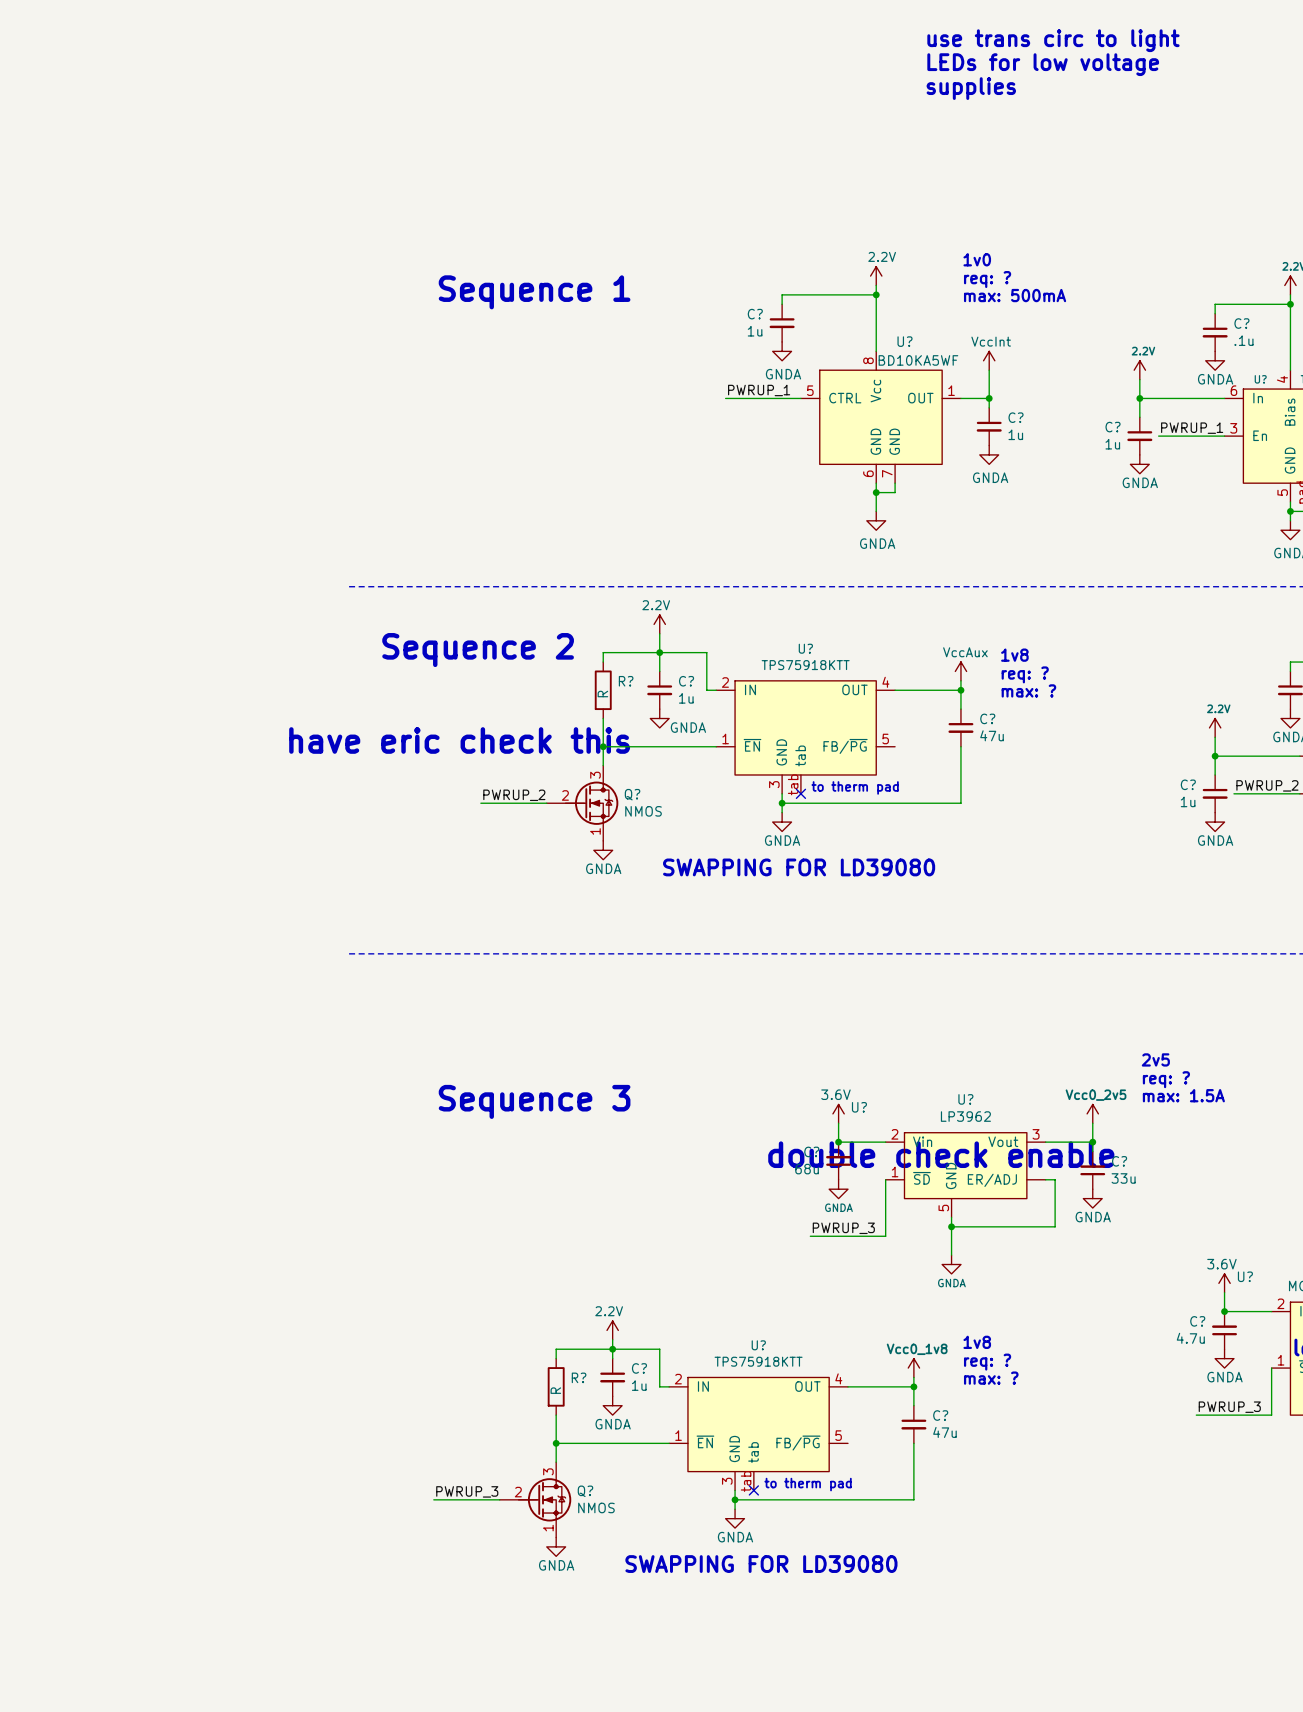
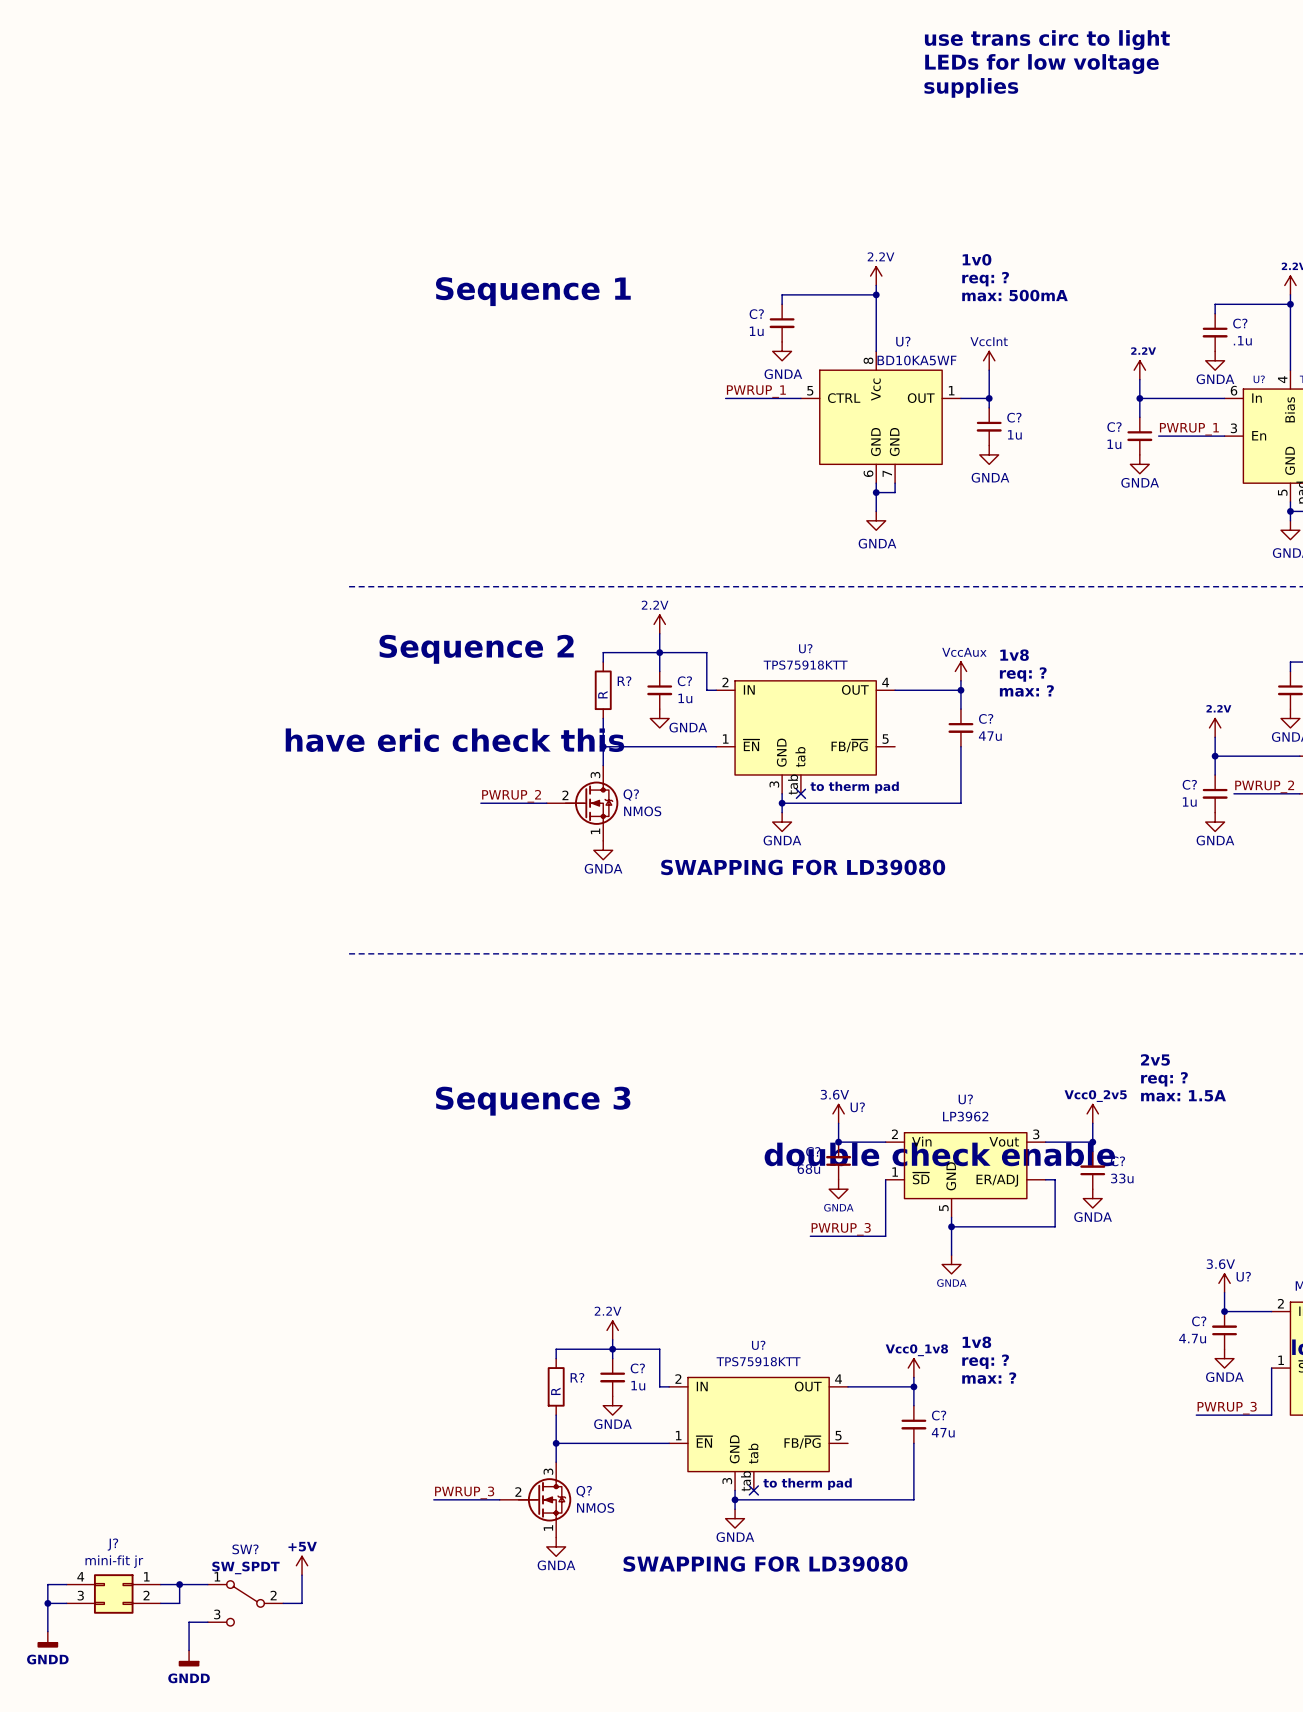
power symbol: none -> +5V (302, 1565)
wire: none -> (302, 1575) (302, 1603) (283, 1603)
wire: none -> (66, 1584) (47, 1584) (47, 1631)
wire: none -> (160, 1584) (207, 1584)
wire: none -> (179, 1584) (179, 1603) (160, 1603)
junction: none -> (179, 1584)
J?: none -> mini-fit jr (113, 1593)
wire: none -> (47, 1603) (66, 1603)
junction: none -> (47, 1603)
SW?: none -> SW_SPDT (245, 1603)
wire: none -> (207, 1622) (189, 1622) (189, 1650)
power symbol: none -> GNDD (47, 1639)
power symbol: none -> GNDD (189, 1658)

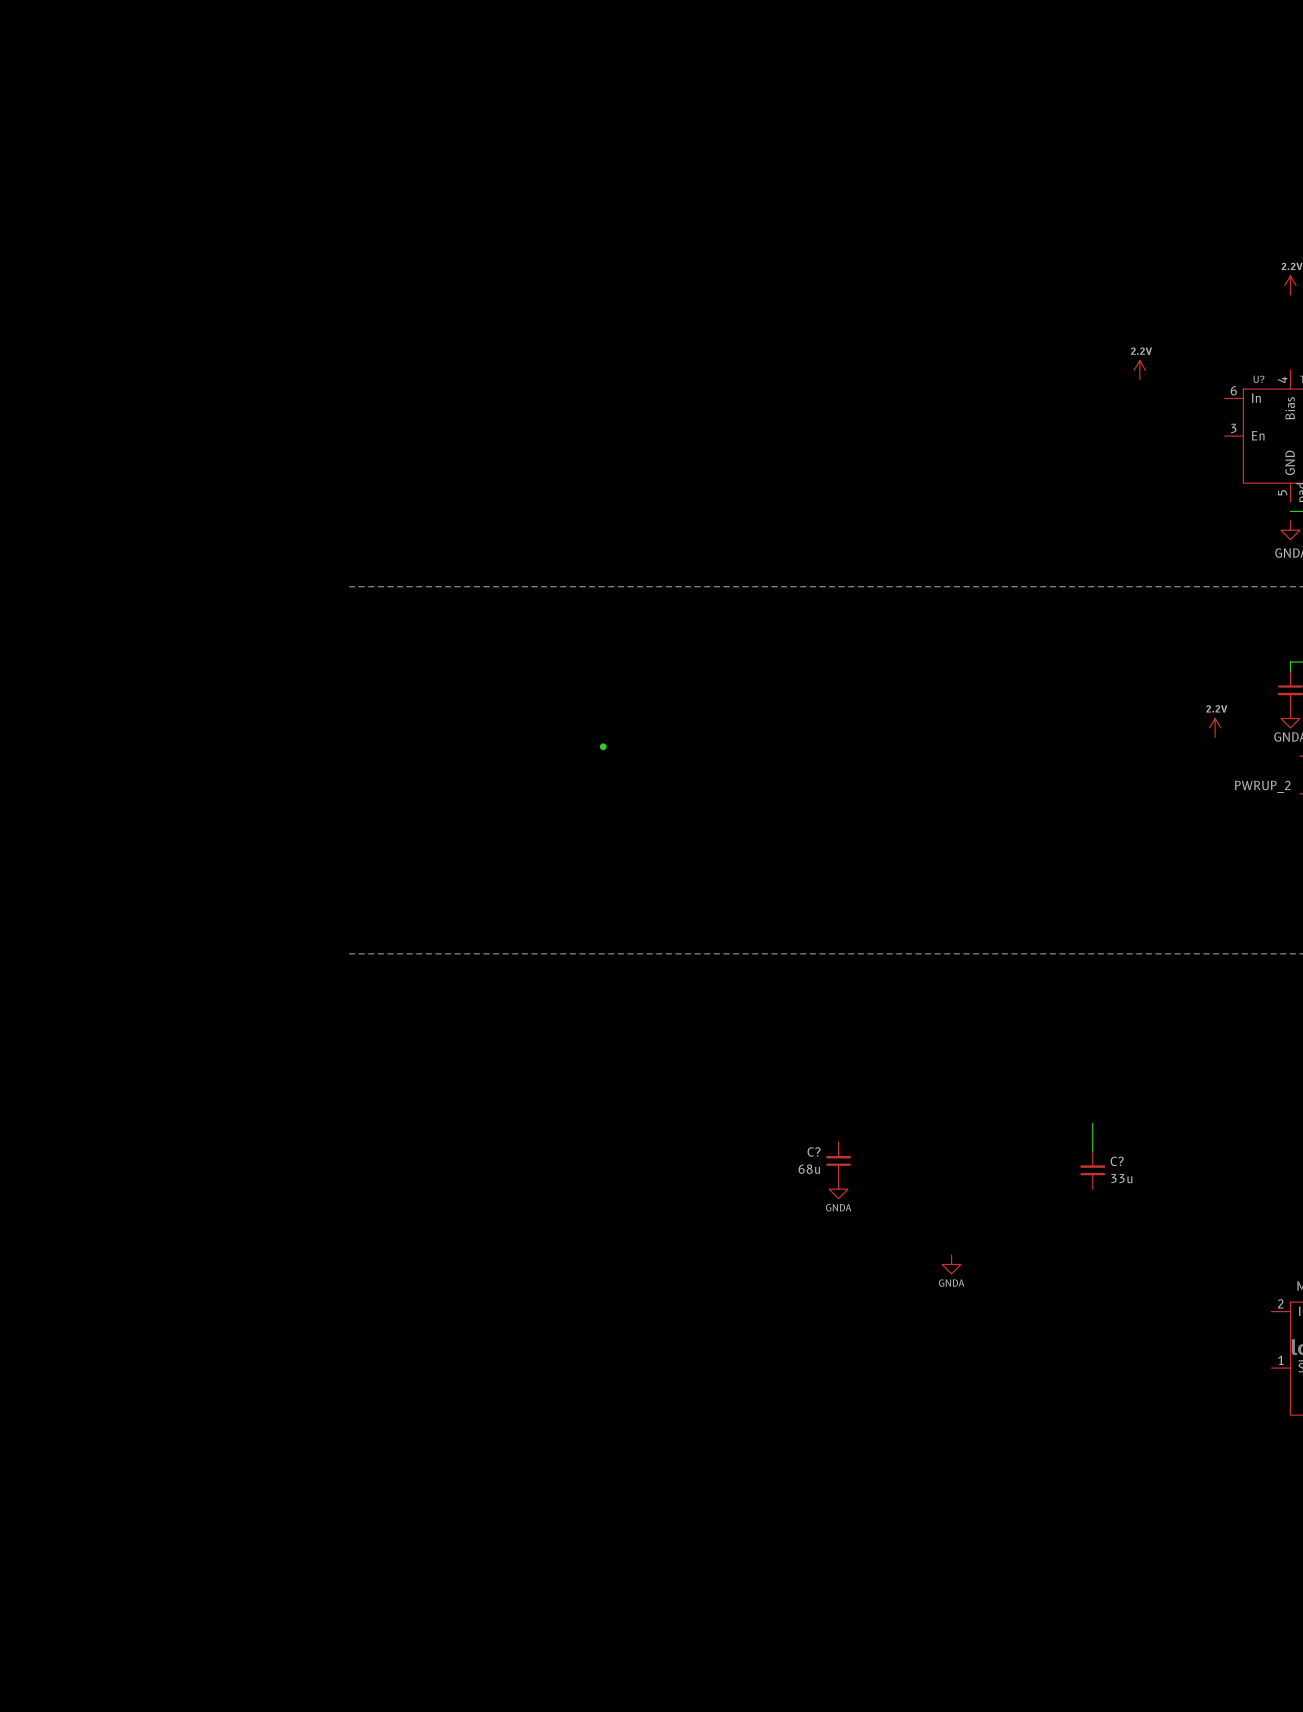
text: use trans circ to light (1047, 40) -> none
text: LEDs for low voltage (1041, 64) -> none
text: supplies (971, 87) -> none
text: 1v0 (977, 259) -> none
part: 2.2V (876, 276) -> none
text: req: ? (985, 279) -> none
wire: (876, 285) (876, 351) -> none
text: Sequence 1 (533, 291) -> none
wire: (876, 294) (782, 294) (782, 304) -> none
junction: (876, 294) -> none
wire: (1290, 294) (1290, 370) -> none
text: max: 500mA (1014, 295) -> none
wire: (1290, 304) (1215, 304) (1215, 313) -> none
junction: (1290, 304) -> none
C?: 1u (782, 323) -> none
C?: .1u (1215, 332) -> none
power symbol: GNDA (782, 351) -> none
part: VccInt (989, 360) -> none
power symbol: GNDA (1215, 360) -> none
wire: (989, 370) (989, 407) -> none
wire: (1139, 379) (1139, 417) -> none
label: PWRUP_1 (756, 391) -> none
wire: (725, 398) (800, 398) -> none
wire: (960, 398) (989, 398) -> none
junction: (989, 398) -> none
wire: (1139, 398) (1224, 398) -> none
junction: (1139, 398) -> none
U?: BD10KA5WF (880, 417) -> none
C?: 1u (989, 426) -> none
label: PWRUP_1 (1189, 429) -> none
C?: 1u (1139, 436) -> none
wire: (1158, 436) (1224, 436) -> none
power symbol: GNDA (989, 454) -> none
power symbol: GNDA (1139, 464) -> none
wire: (876, 483) (876, 511) -> none
wire: (895, 483) (895, 492) (876, 492) -> none
junction: (876, 492) -> none
wire: (1290, 501) (1290, 520) -> none
junction: (1290, 511) -> none
power symbol: GNDA (876, 520) -> none
part: 2.2V (659, 624) -> none
wire: (659, 633) (659, 671) -> none
text: Sequence 2 (476, 649) -> none
junction: (659, 652) -> none
text: 1v8 (1014, 655) -> none
wire: (603, 662) (603, 652) (706, 652) (706, 690) (716, 690) -> none
part: VccAux (960, 671) -> none
text: req: ? (1023, 674) -> none
wire: (960, 680) (960, 709) -> none
R?: R (603, 690) -> none
C?: 1u (659, 690) -> none
wire: (895, 690) (960, 690) -> none
junction: (960, 690) -> none
text: max: ? (1026, 690) -> none
wire: (603, 718) (603, 765) -> none
power symbol: GNDA (659, 718) -> none
C?: 47u (960, 727) -> none
U?: TPS75918KTT (805, 737) -> none
wire: (1215, 737) (1215, 774) -> none
text: have eric check this (454, 740) -> none
wire: (603, 746) (716, 746) -> none
wire: (960, 746) (960, 803) (782, 803) -> none
wire: (1215, 756) (1299, 756) -> none
junction: (1215, 756) -> none
text: to therm pad (854, 787) -> none
wire: (782, 793) (782, 812) -> none
no-connect mark: (800, 793) -> none
C?: 1u (1215, 793) -> none
wire: (1233, 793) (1299, 793) -> none
label: PWRUP_2 (511, 796) -> none
wire: (480, 803) (546, 803) -> none
Q?: NMOS (582, 803) -> none
junction: (782, 803) -> none
power symbol: GNDA (782, 822) -> none
power symbol: GNDA (1215, 822) -> none
power symbol: GNDA (603, 850) -> none
text: SWAPPING FOR LD39080 (803, 867) -> none
text: 2v5 (1155, 1059) -> none
text: req: ? (1164, 1079) -> none
text: max: 1.5A (1183, 1095) -> none
text: Sequence 3 (533, 1101) -> none
U?: 3.6V (838, 1113) -> none
part: Vcc0_2v5 (1092, 1113) -> none
wire: (838, 1123) (838, 1142) (885, 1142) -> none
junction: (838, 1142) -> none
wire: (1045, 1142) (1092, 1142) -> none
junction: (1092, 1142) -> none
text: double check enable (939, 1154) -> none
U?: LP3962 (965, 1175) -> none
wire: (885, 1179) (885, 1236) (810, 1236) -> none
wire: (1045, 1179) (1055, 1179) (1055, 1226) (951, 1226) -> none
power symbol: GNDA (1092, 1198) -> none
wire: (951, 1217) (951, 1255) -> none
junction: (951, 1226) -> none
label: PWRUP_3 (841, 1229) -> none
U?: 3.6V (1224, 1283) -> none
wire: (1224, 1292) (1224, 1311) (1271, 1311) -> none
junction: (1224, 1311) -> none
part: 2.2V (612, 1330) -> none
C?: 4.7u (1224, 1330) -> none
wire: (612, 1339) (612, 1358) -> none
text: 1v8 (976, 1342) -> none
junction: (612, 1349) -> none
wire: (556, 1358) (556, 1349) (659, 1349) (659, 1386) (669, 1386) -> none
power symbol: GNDA (1224, 1358) -> none
text: req: ? (985, 1361) -> none
part: Vcc0_1v8 (913, 1368) -> none
wire: (1271, 1368) (1271, 1415) (1196, 1415) -> none
C?: 1u (612, 1377) -> none
wire: (913, 1377) (913, 1405) -> none
text: max: ? (989, 1378) -> none
R?: R (556, 1386) -> none
wire: (848, 1386) (913, 1386) -> none
junction: (913, 1386) -> none
power symbol: GNDA (612, 1405) -> none
label: PWRUP_3 (1227, 1408) -> none
wire: (556, 1415) (556, 1462) -> none
C?: 47u (913, 1424) -> none
U?: TPS75918KTT (758, 1433) -> none
wire: (556, 1443) (669, 1443) -> none
junction: (556, 1443) -> none
wire: (913, 1443) (913, 1499) (735, 1499) -> none
text: to therm pad (807, 1484) -> none
wire: (735, 1490) (735, 1509) -> none
no-connect mark: (753, 1490) -> none
label: PWRUP_3 (464, 1492) -> none
wire: (433, 1499) (499, 1499) -> none
Q?: NMOS (535, 1499) -> none
junction: (735, 1499) -> none
power symbol: GNDA (735, 1518) -> none
power symbol: GNDA (556, 1546) -> none
text: SWAPPING FOR LD39080 (765, 1564) -> none
power symbol: +5V (302, 1565) -> none
wire: (302, 1575) (302, 1603) (283, 1603) -> none
wire: (66, 1584) (47, 1584) (47, 1631) -> none
wire: (160, 1584) (207, 1584) -> none
wire: (179, 1584) (179, 1603) (160, 1603) -> none
junction: (179, 1584) -> none
J?: mini-fit jr (113, 1593) -> none
wire: (47, 1603) (66, 1603) -> none
junction: (47, 1603) -> none
SW?: SW_SPDT (245, 1603) -> none
wire: (207, 1622) (189, 1622) (189, 1650) -> none
power symbol: GNDD (47, 1639) -> none
power symbol: GNDD (189, 1658) -> none

